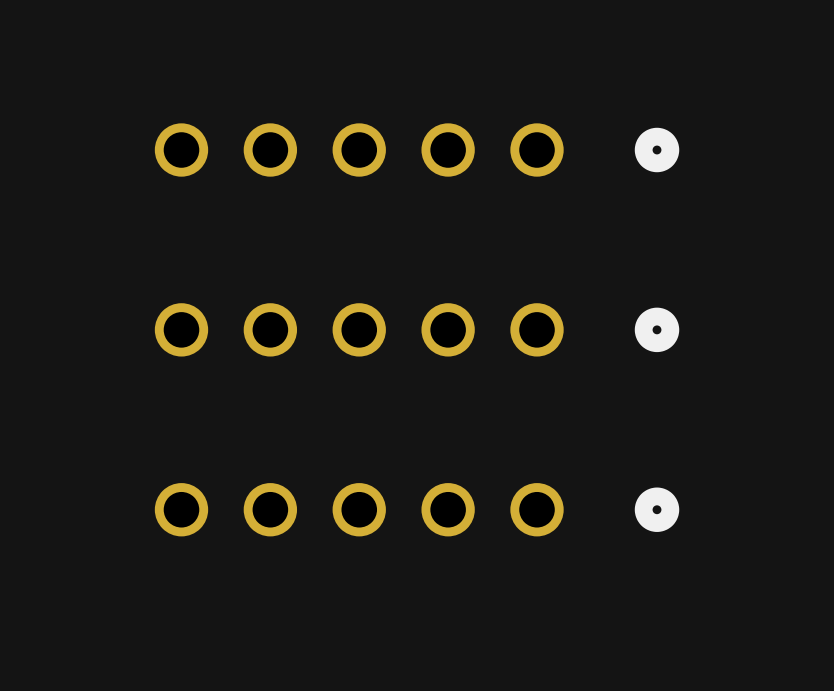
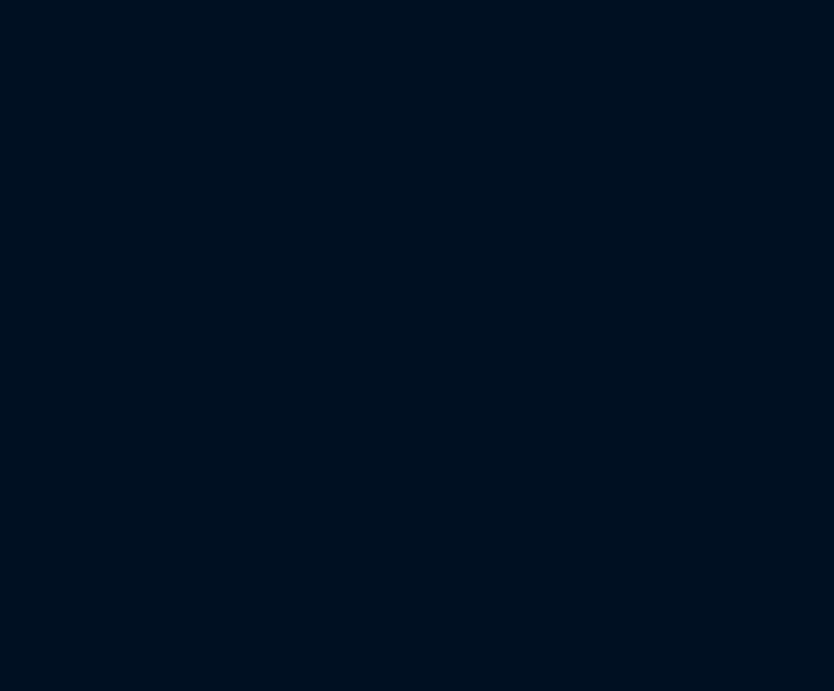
part: (417, 150) -> none
part: (417, 329) -> none
part: (417, 509) -> none

